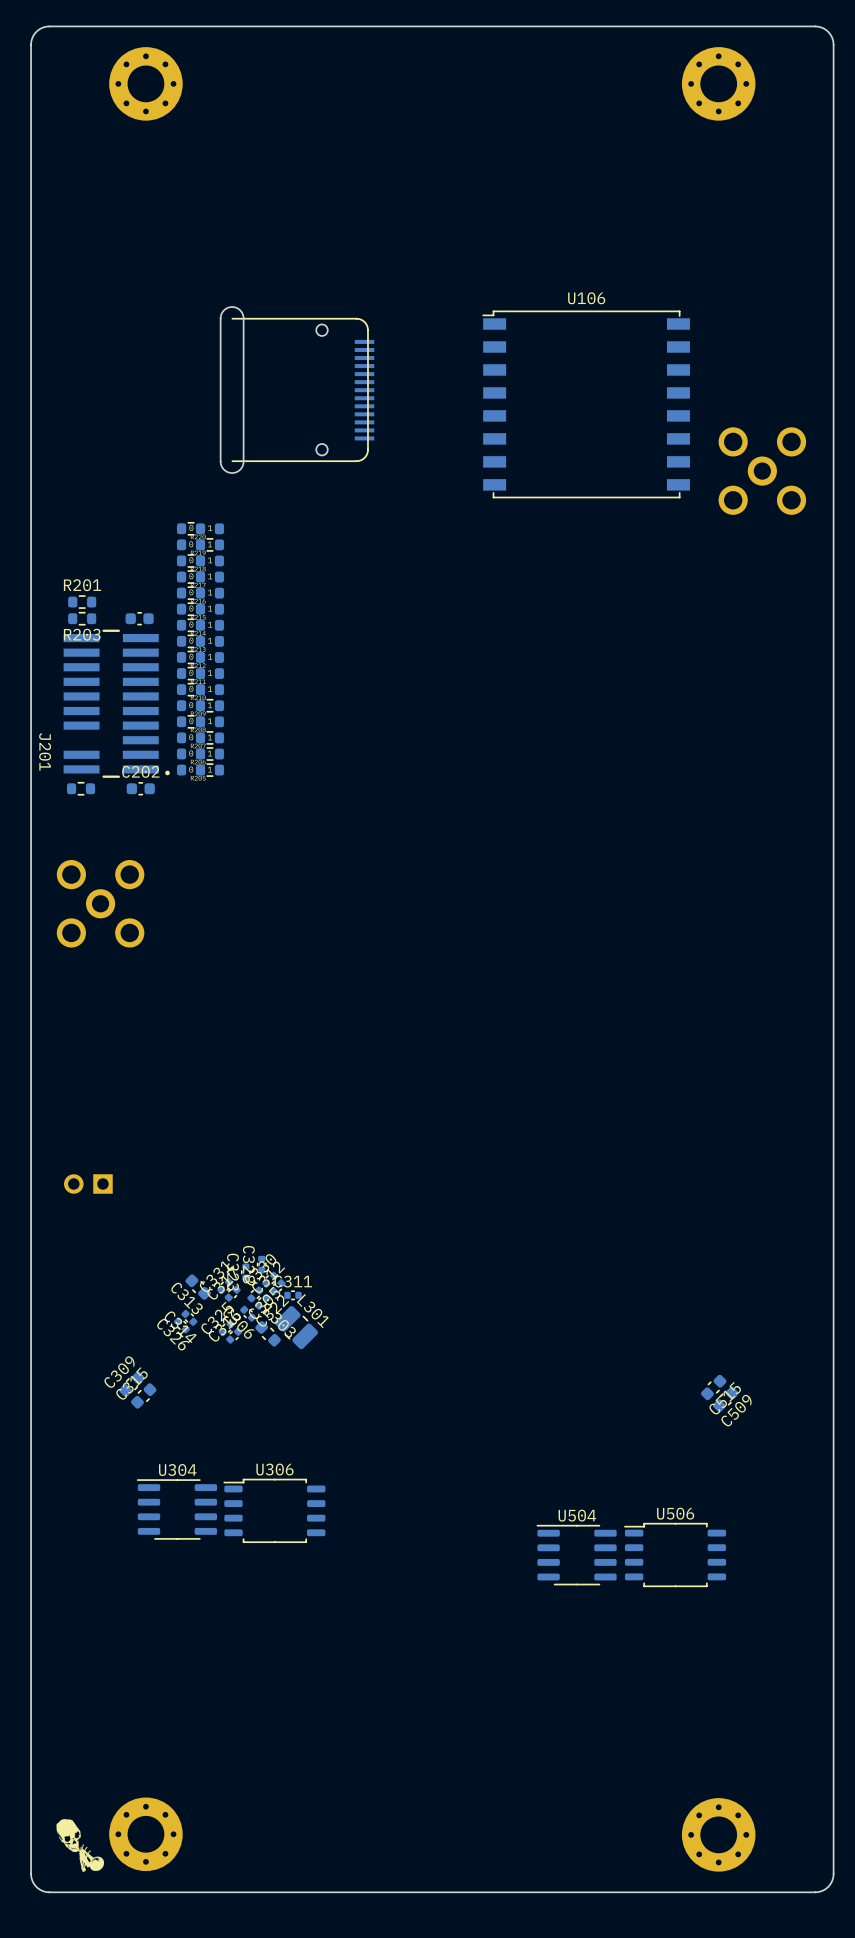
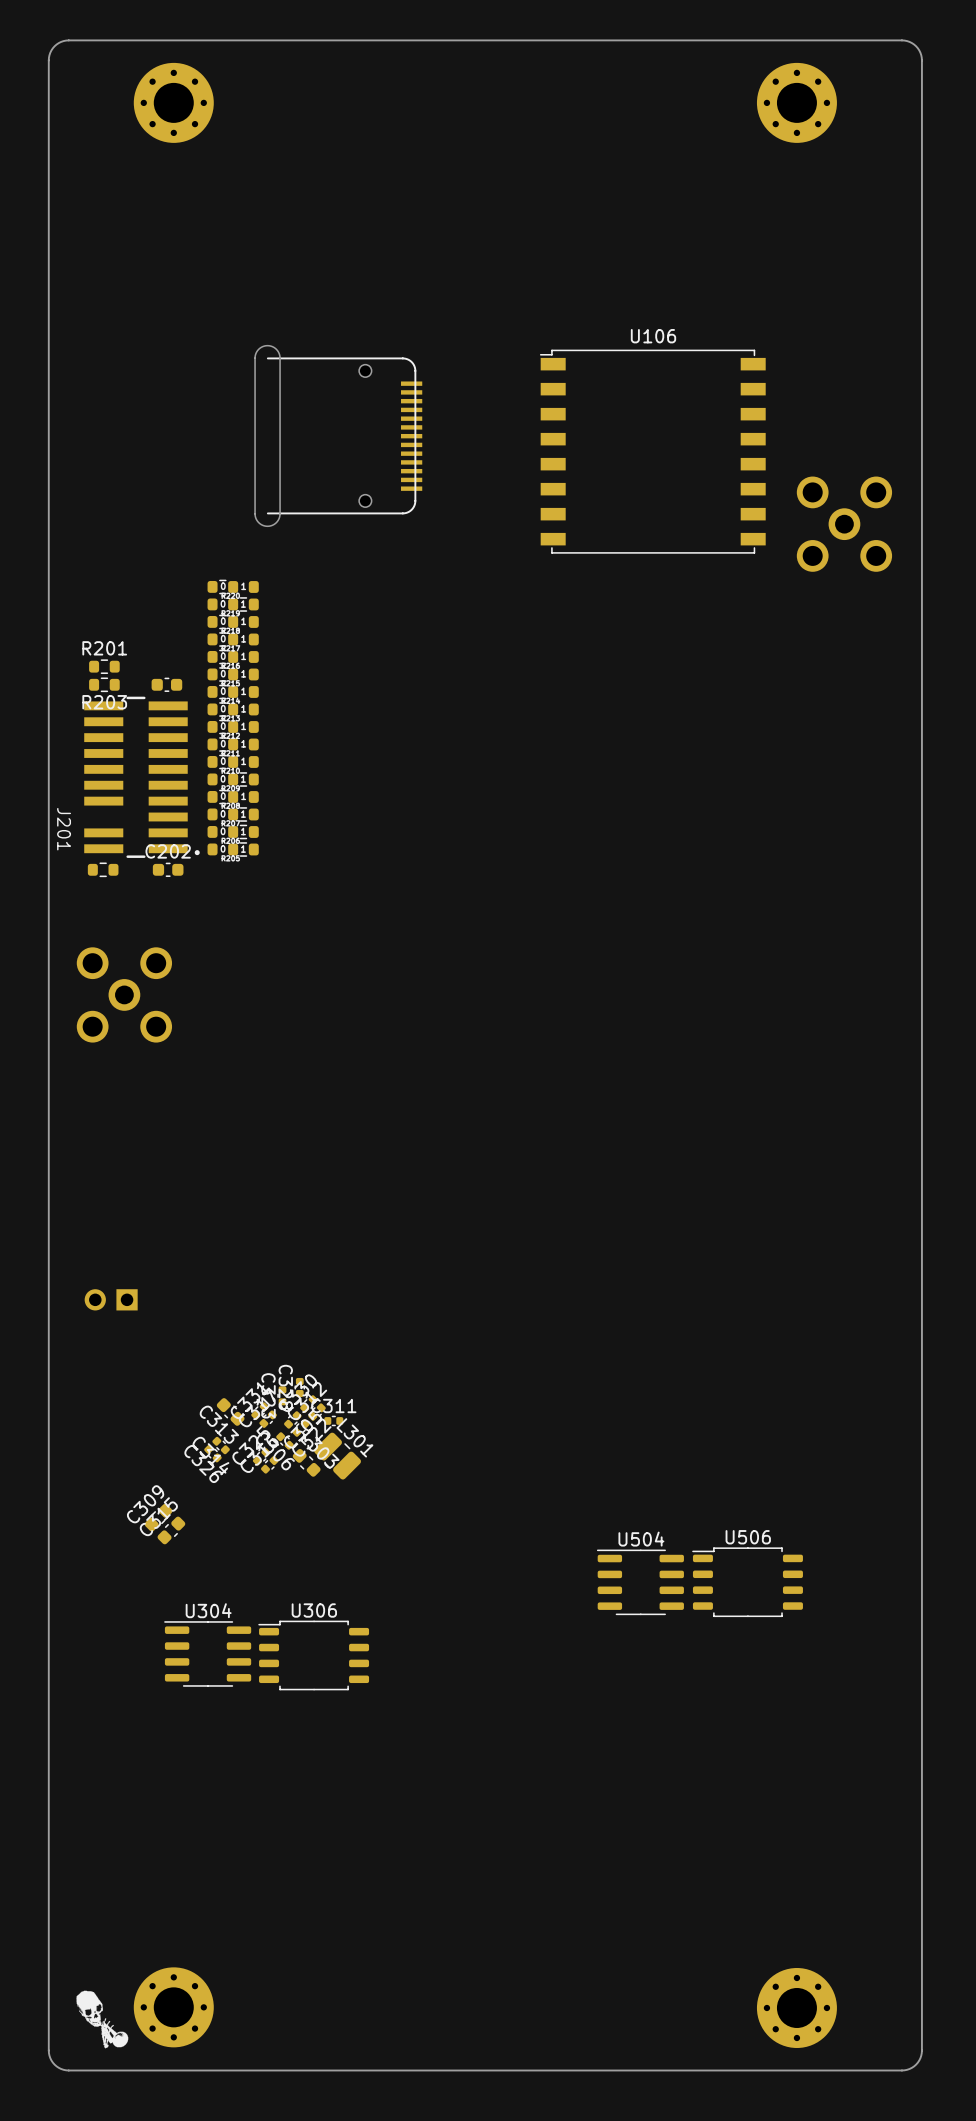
C515: (713, 1387) -> none
C509: (725, 1399) -> none
U506 position: (675, 1554) -> (747, 1582)
U504 position: (576, 1555) -> (640, 1582)

